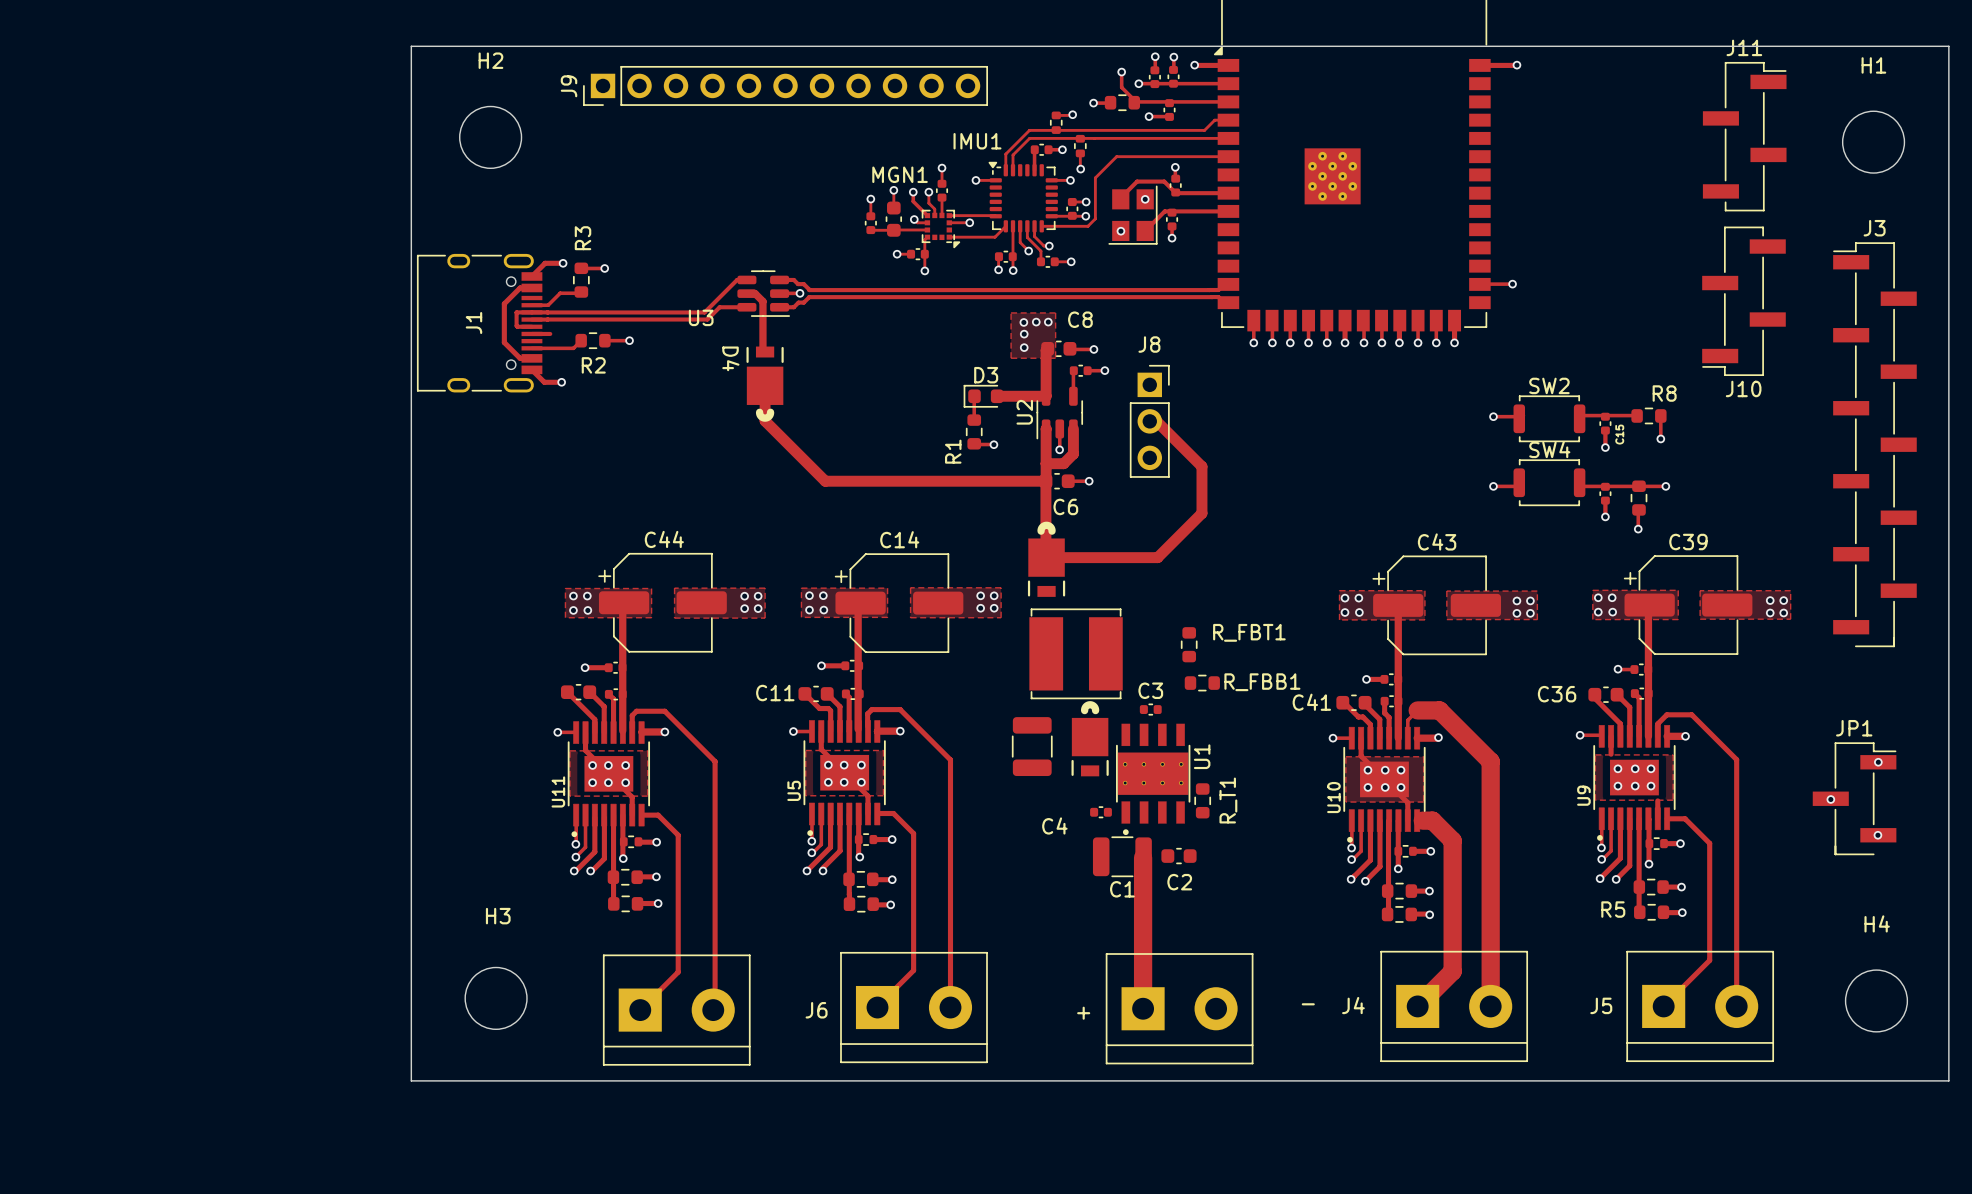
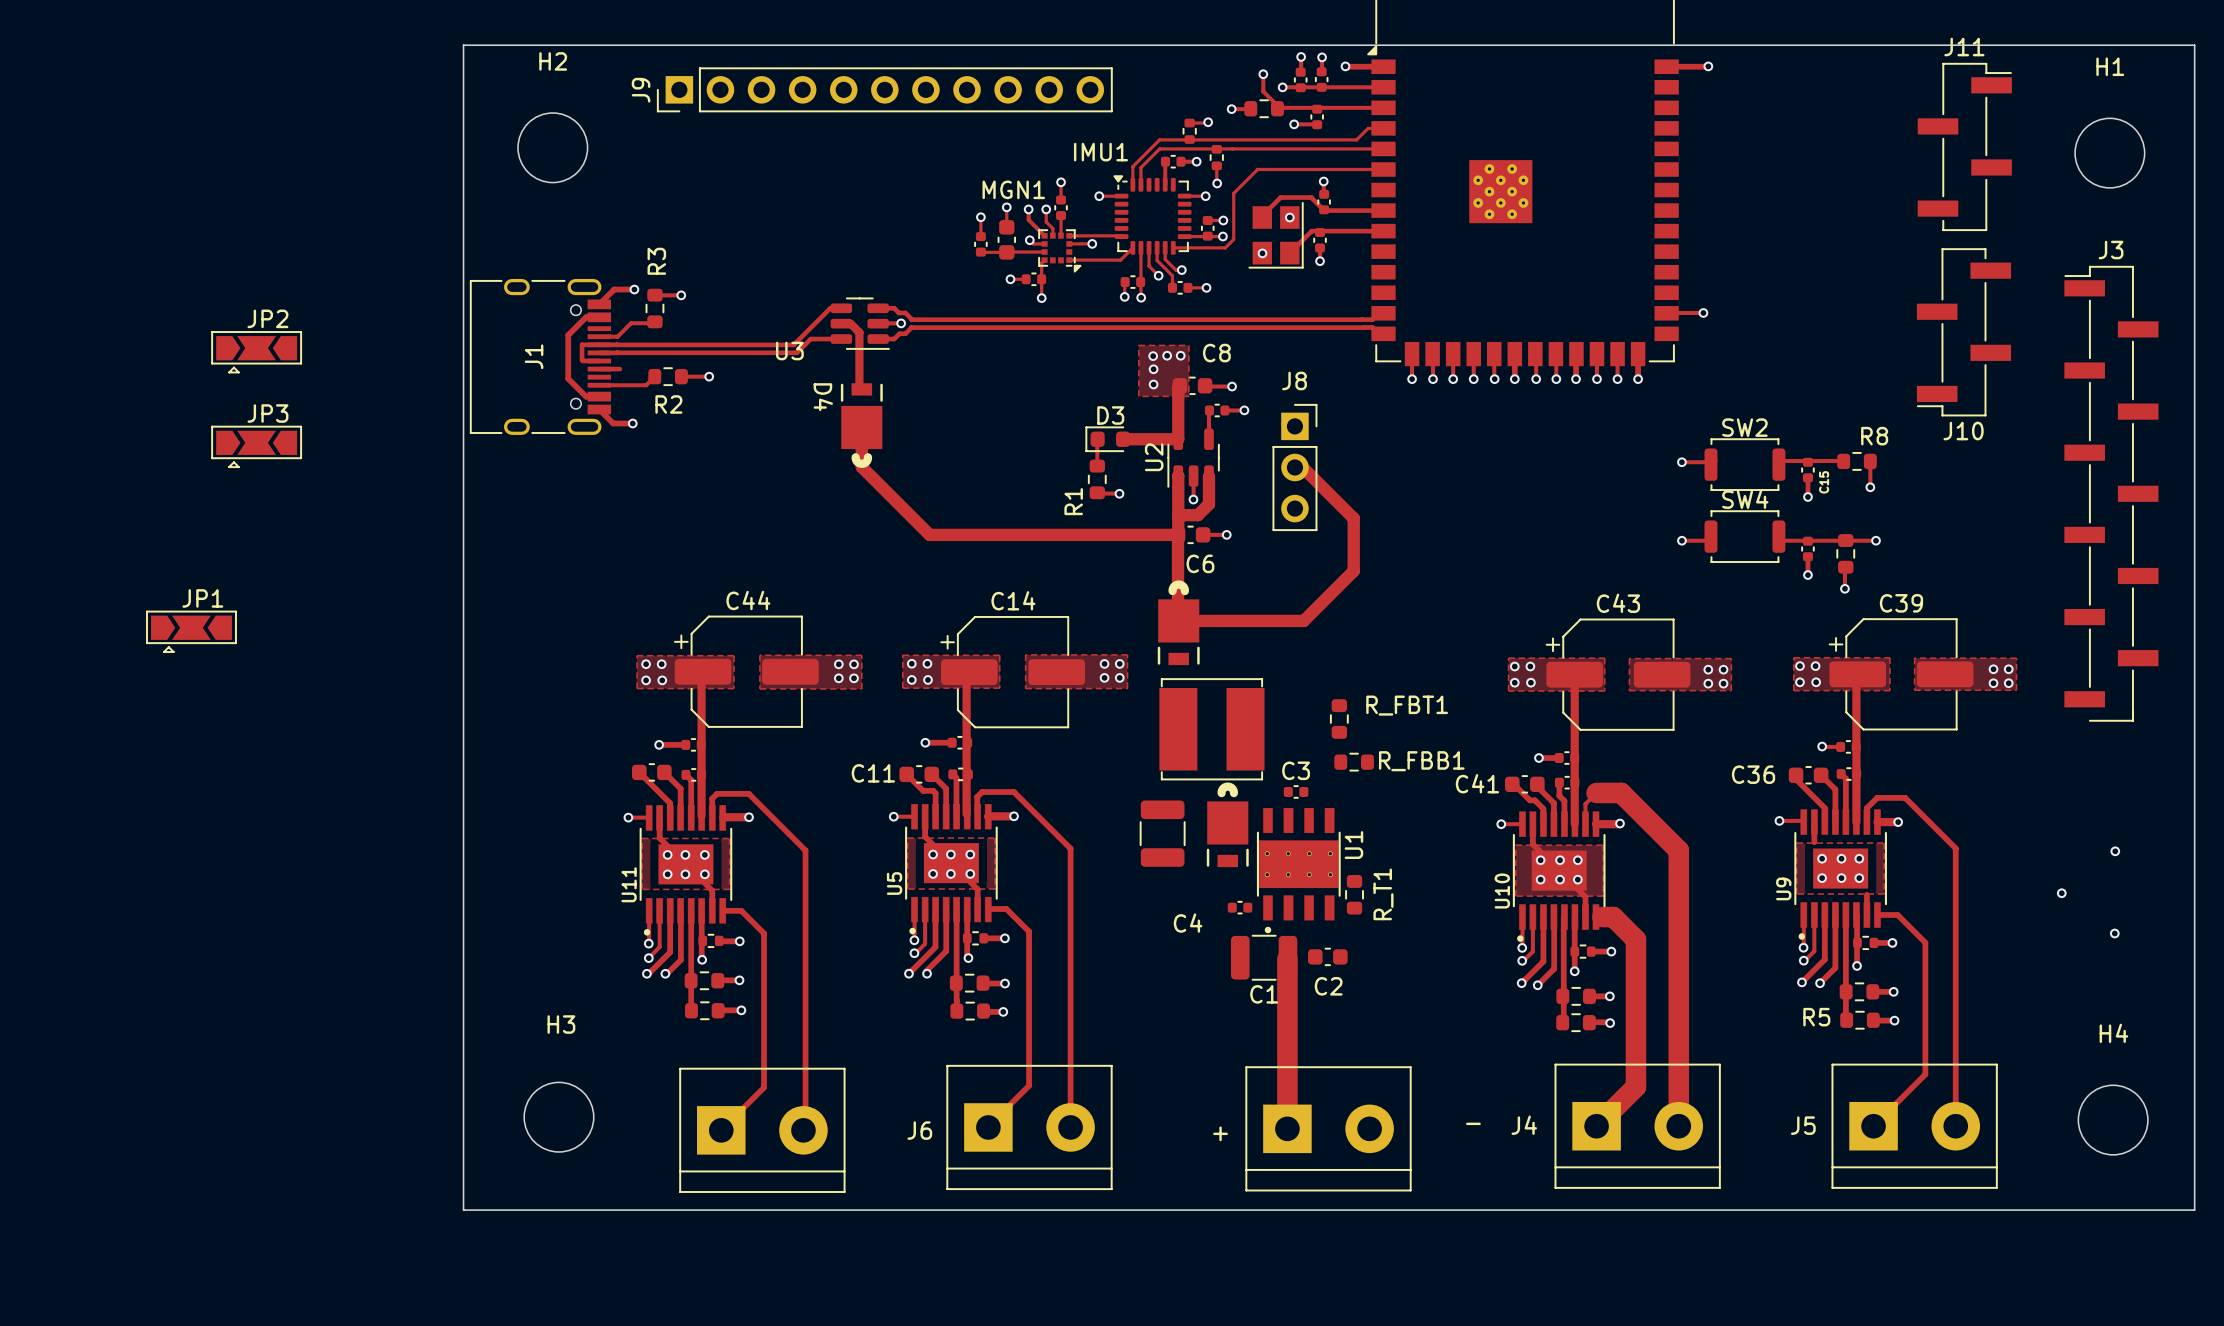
JP2: none -> (256, 352)
JP3: none -> (256, 446)
JP1 name position: JP1 (1854, 728) -> JP1 (202, 598)
JP1 footprint: [1812, 742, 1897, 856] -> [146, 610, 237, 654]

